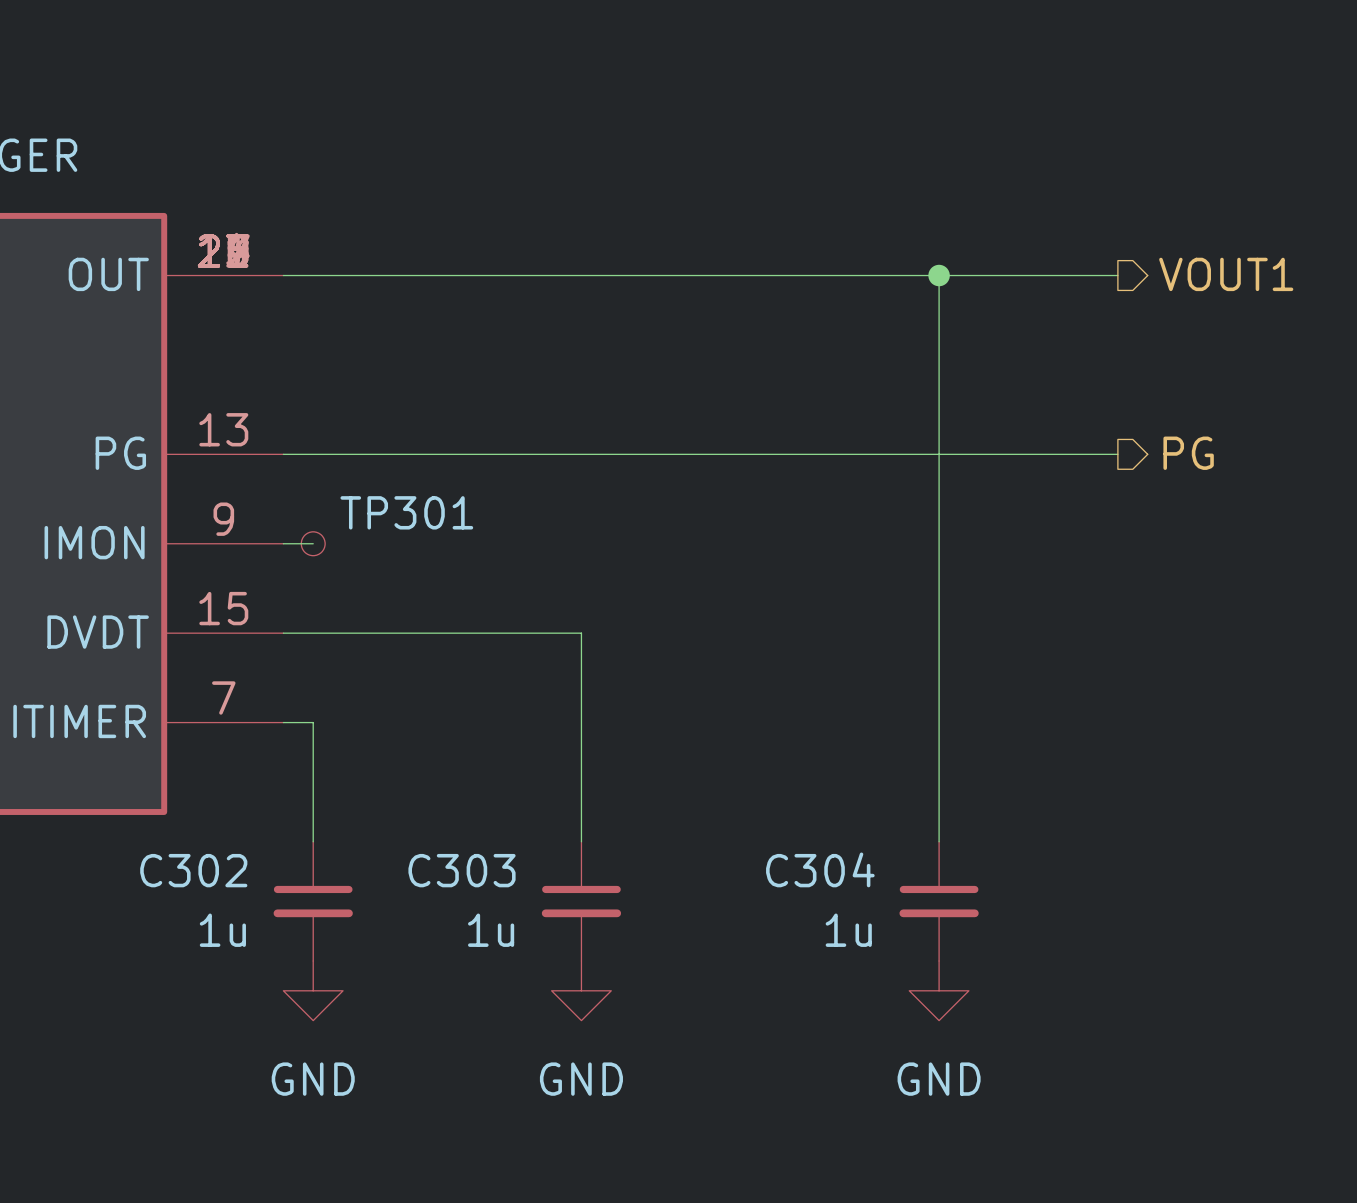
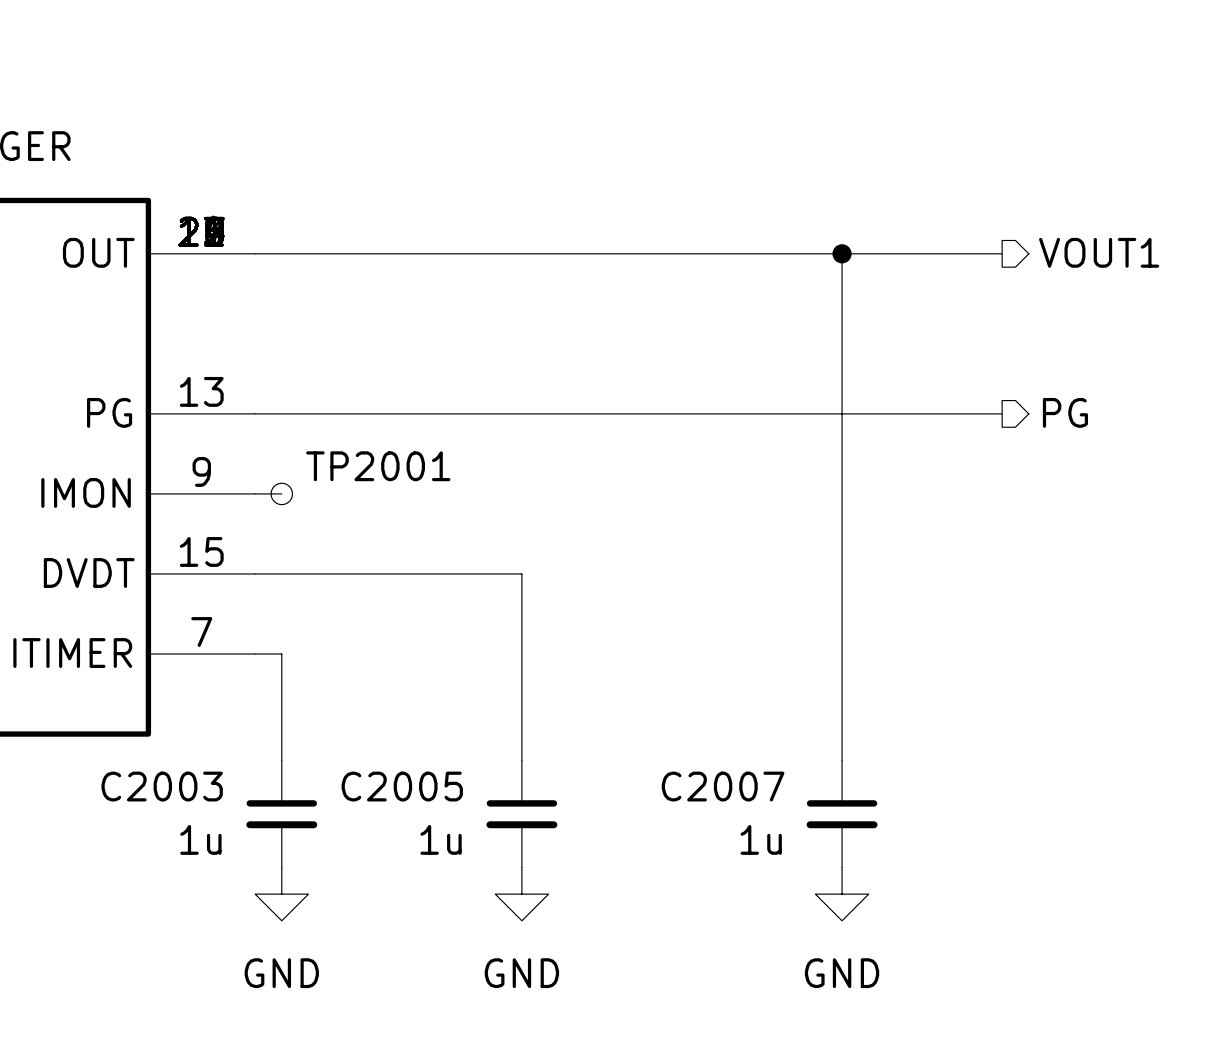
TP301 name: TP301 (406, 512) -> TP2001 (378, 466)
C304 name: C304 (820, 869) -> C2007 (723, 786)
C302 name: C302 (193, 870) -> C2003 (162, 786)
C303 name: C303 (462, 870) -> C2005 (402, 786)

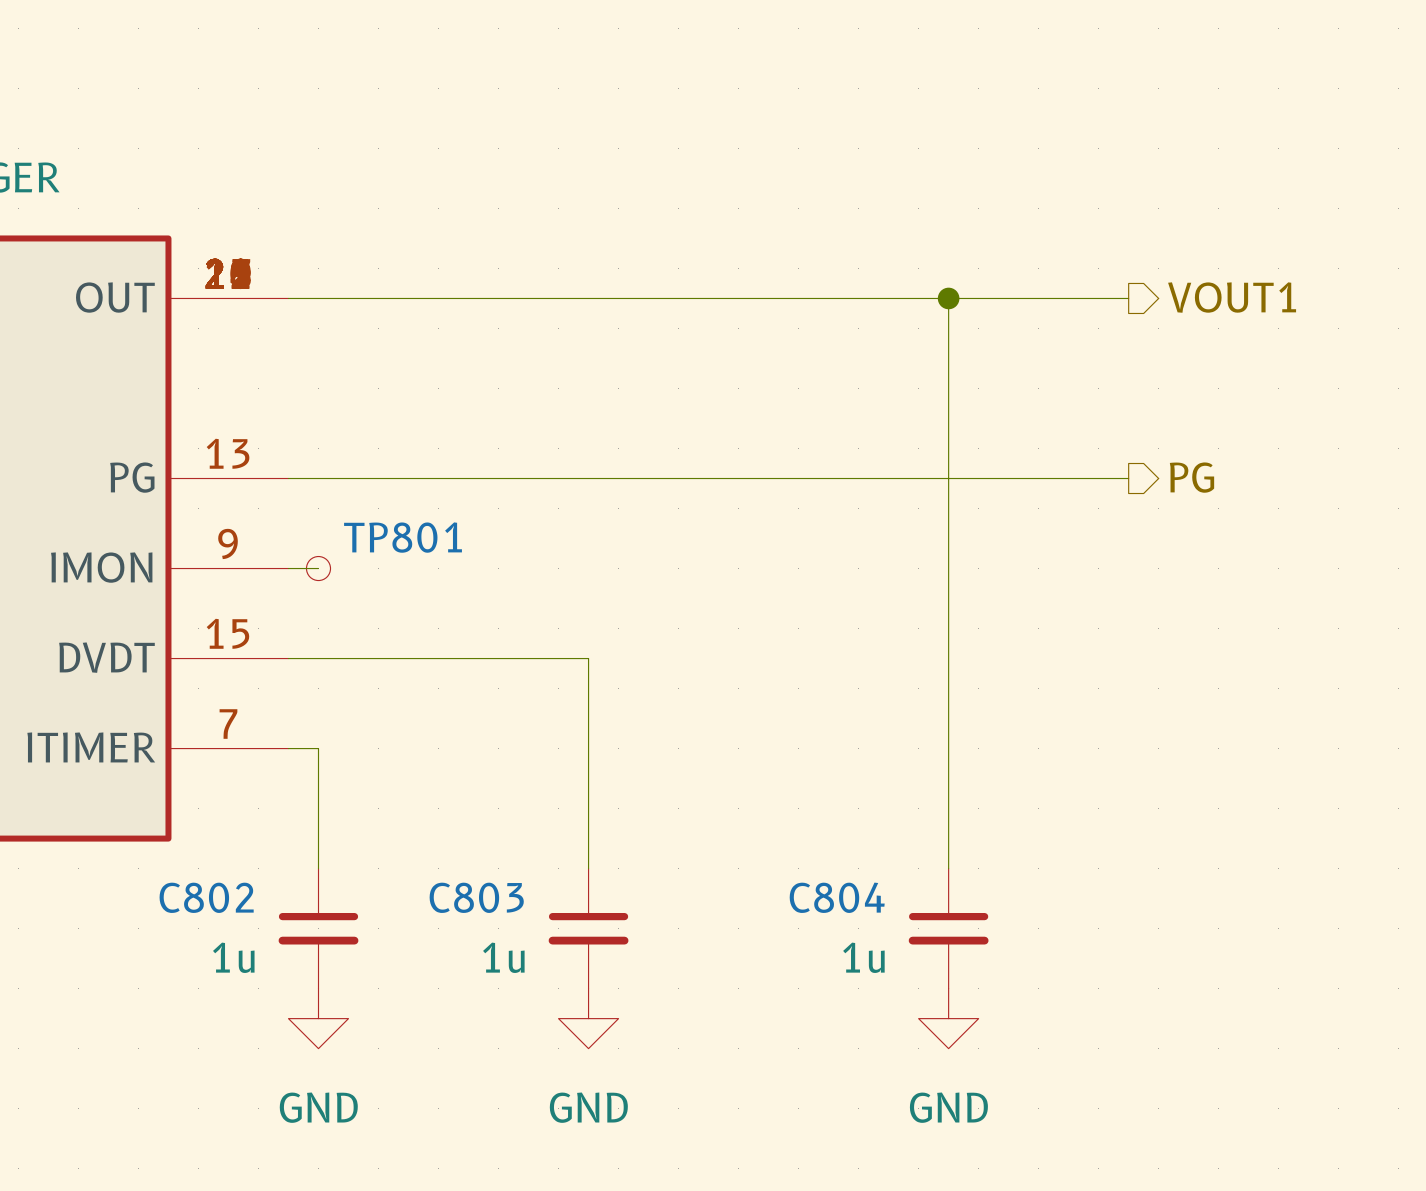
TP2001 name: TP2001 (378, 466) -> TP801 (403, 537)
C2003 name: C2003 (162, 786) -> C802 (206, 897)
C2005 name: C2005 (402, 786) -> C803 (476, 897)
C2007 name: C2007 (723, 786) -> C804 (837, 897)

